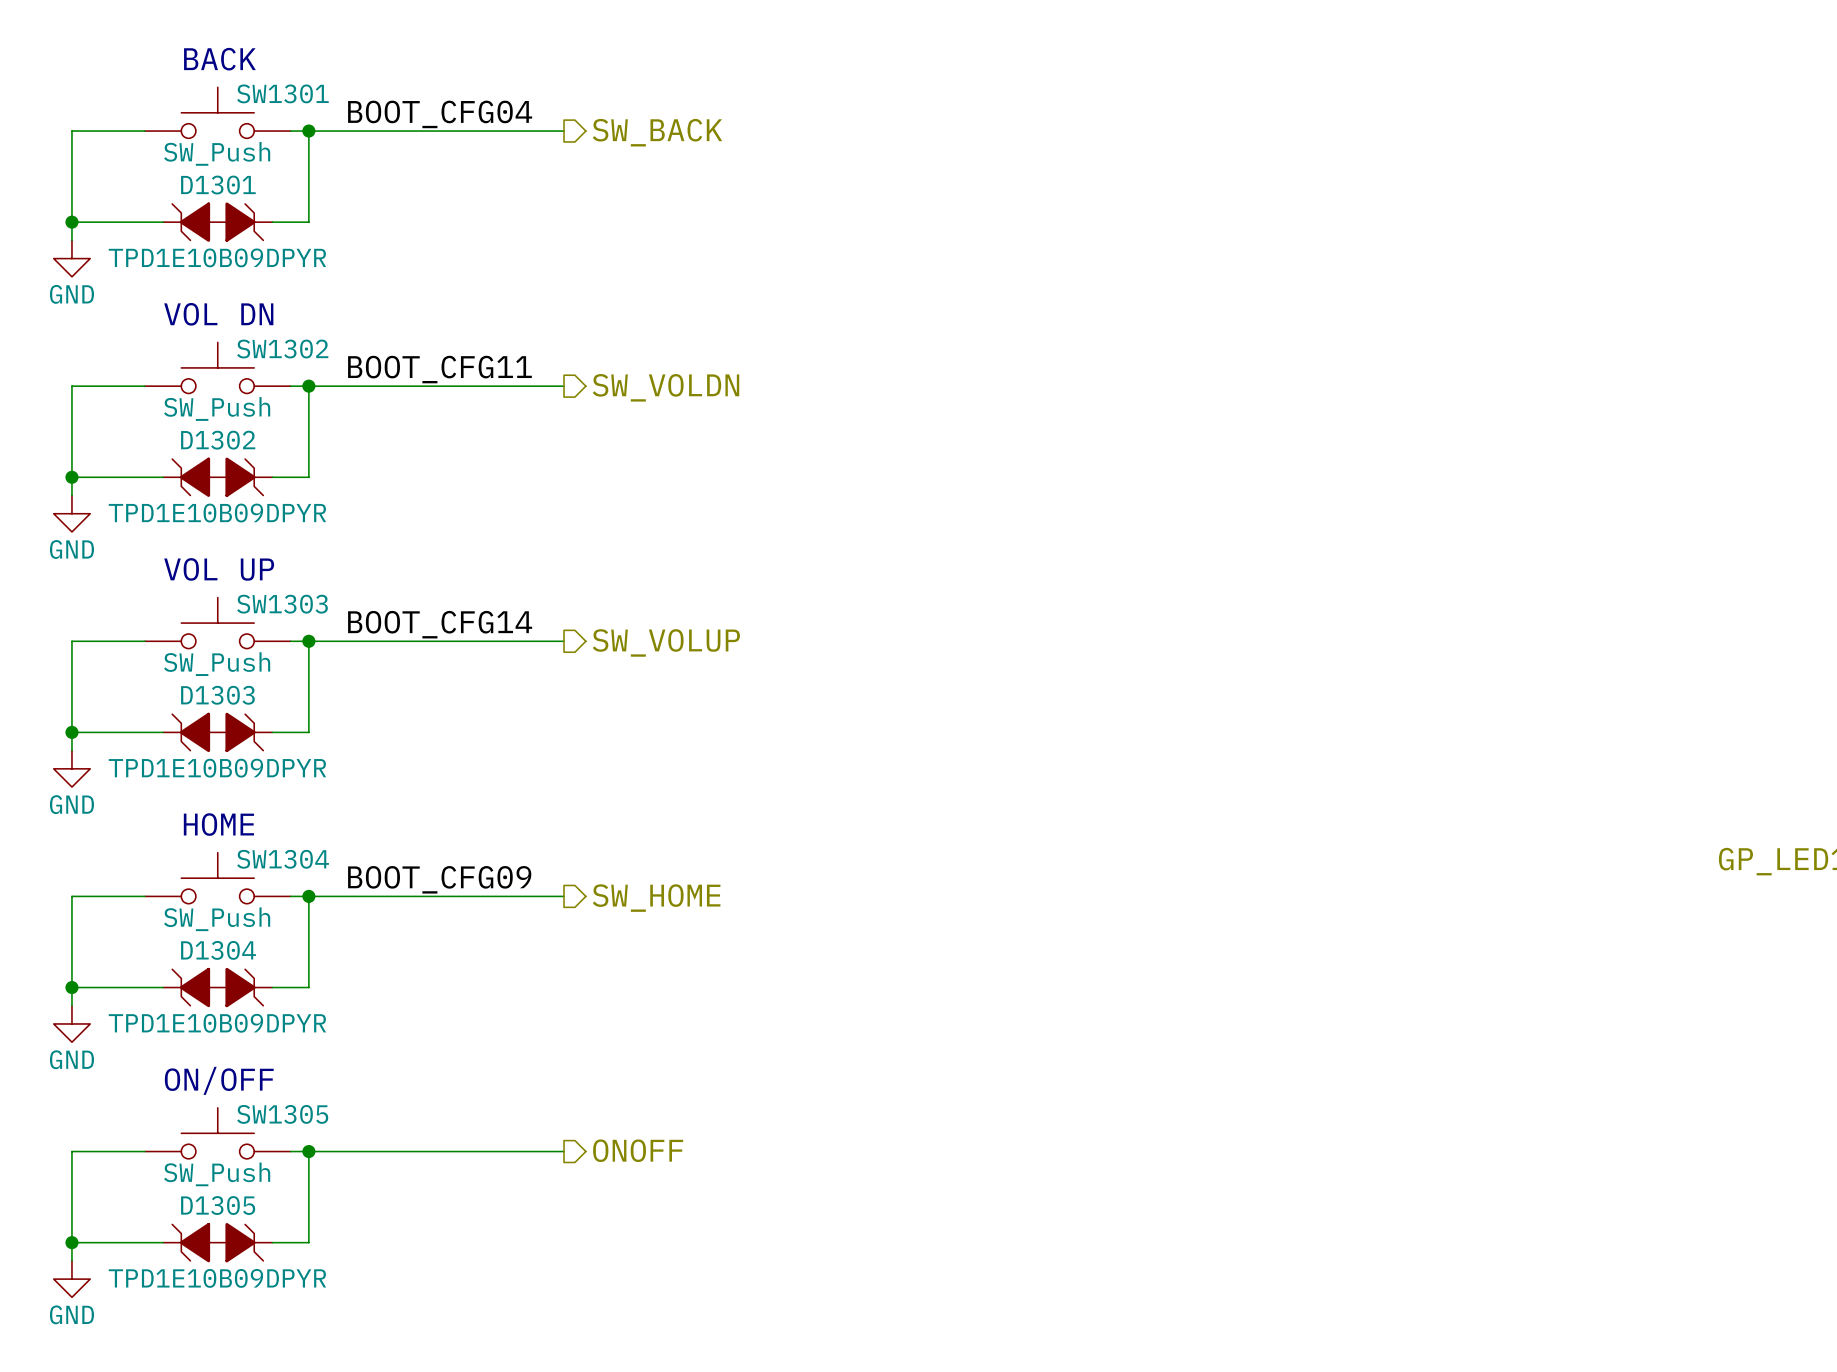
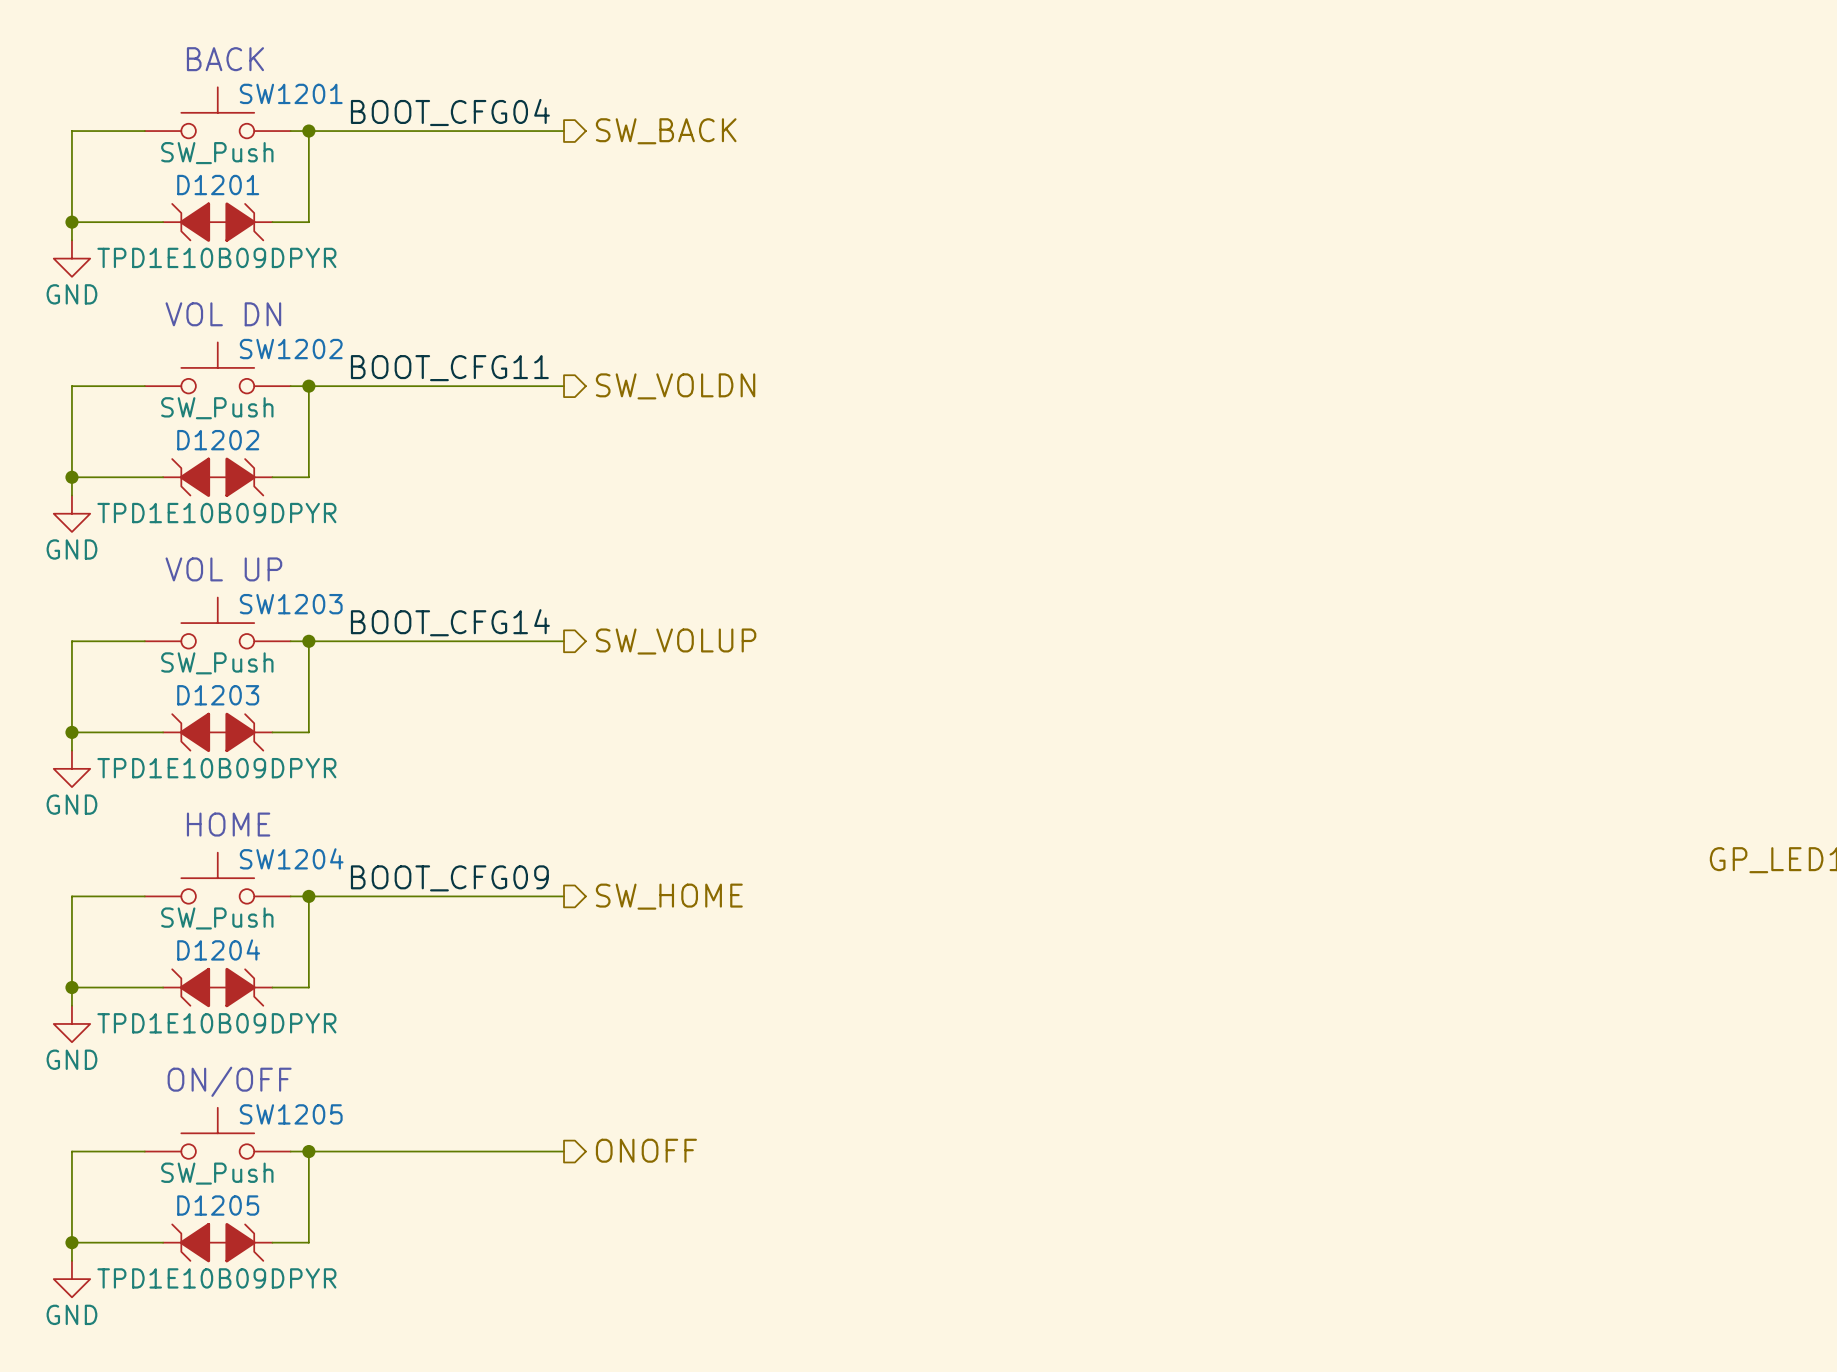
SW1301 name: SW1301 (282, 93) -> SW1201 (291, 93)
D1301 name: D1301 (218, 185) -> D1201 (218, 185)
SW1302 name: SW1302 (282, 349) -> SW1202 (291, 349)
D1302 name: D1302 (218, 440) -> D1202 (218, 440)
SW1303 name: SW1303 (282, 604) -> SW1203 (291, 604)
D1303 name: D1303 (217, 695) -> D1203 (218, 695)
SW1304 name: SW1304 (283, 859) -> SW1204 (291, 858)
D1304 name: D1304 (218, 950) -> D1204 (218, 949)
SW1305 name: SW1305 (282, 1114) -> SW1205 (291, 1114)
D1305 name: D1305 (218, 1205) -> D1205 (218, 1205)

